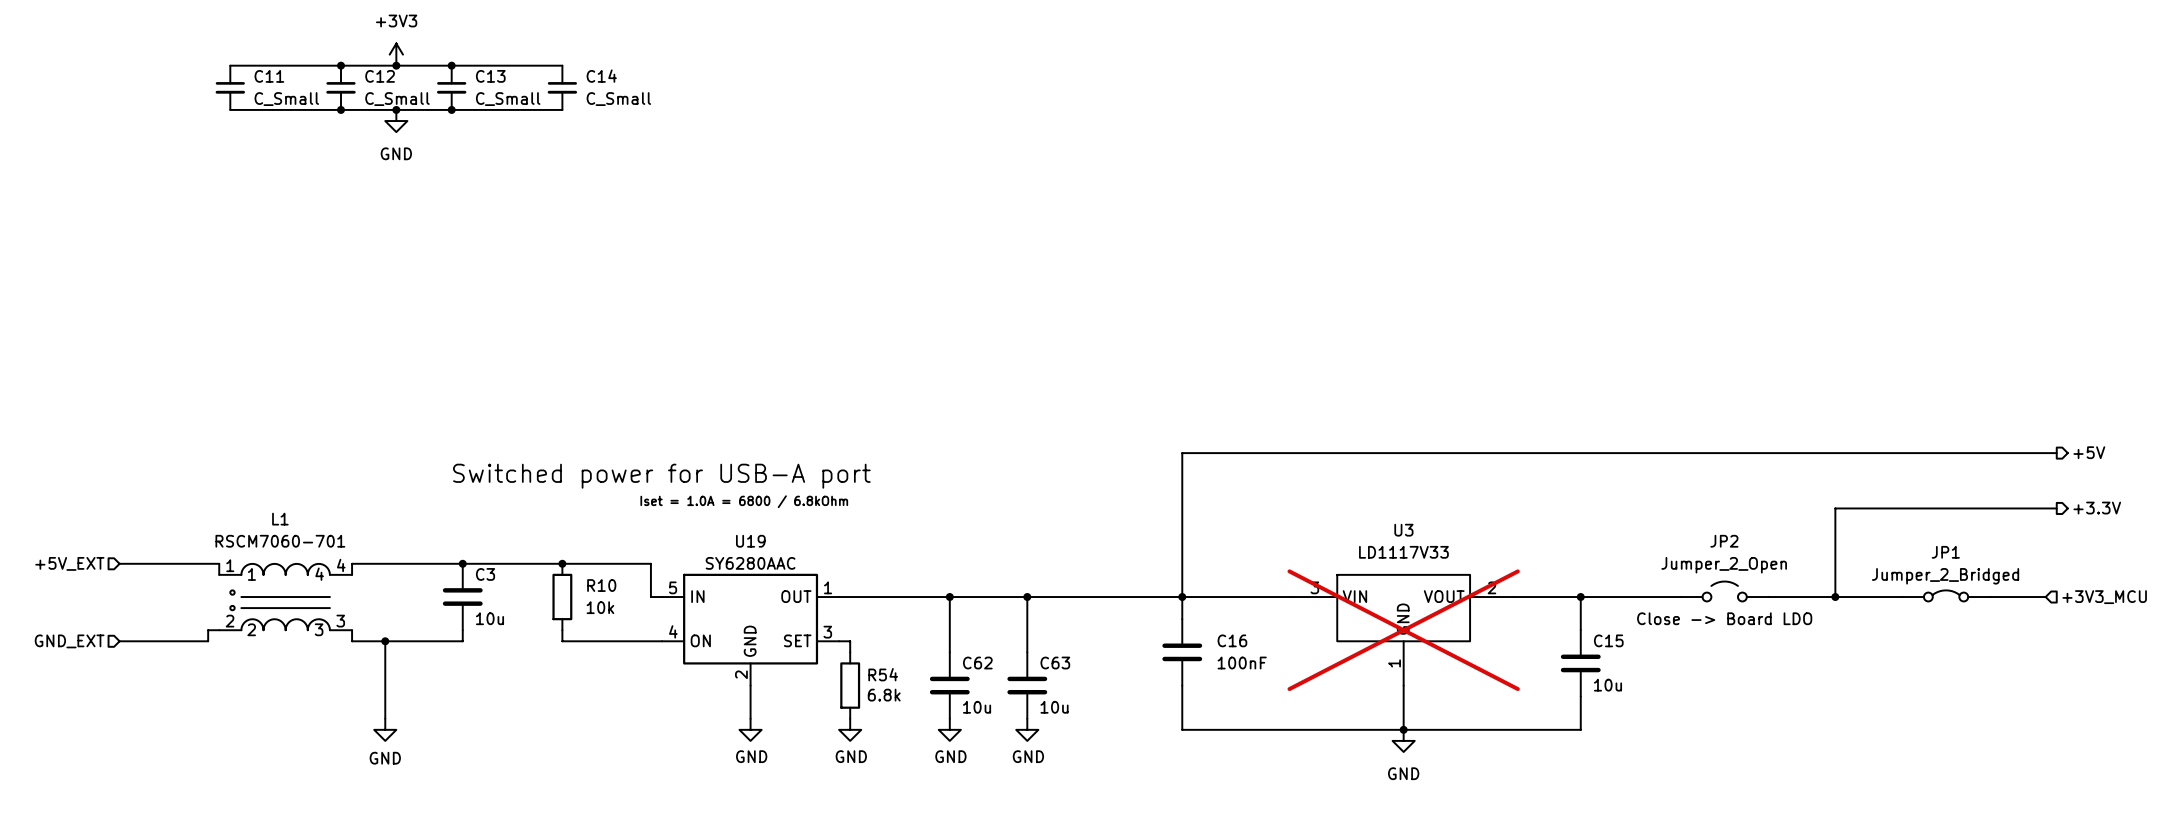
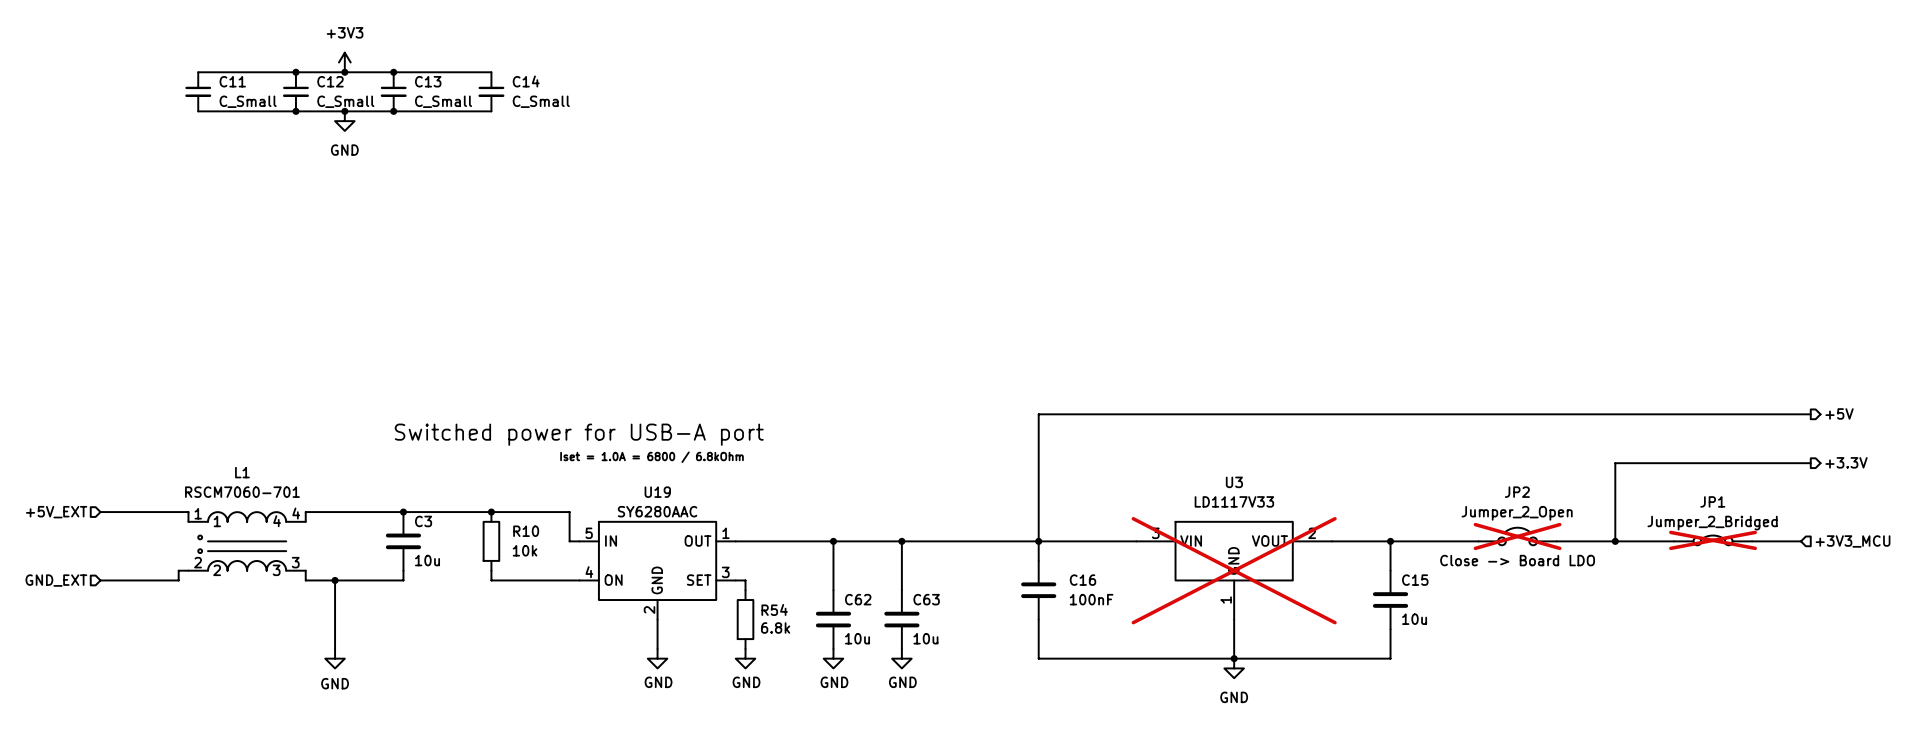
JP2 do-not-place cross: none -> (1517, 536)
JP1 do-not-place cross: none -> (1713, 540)

